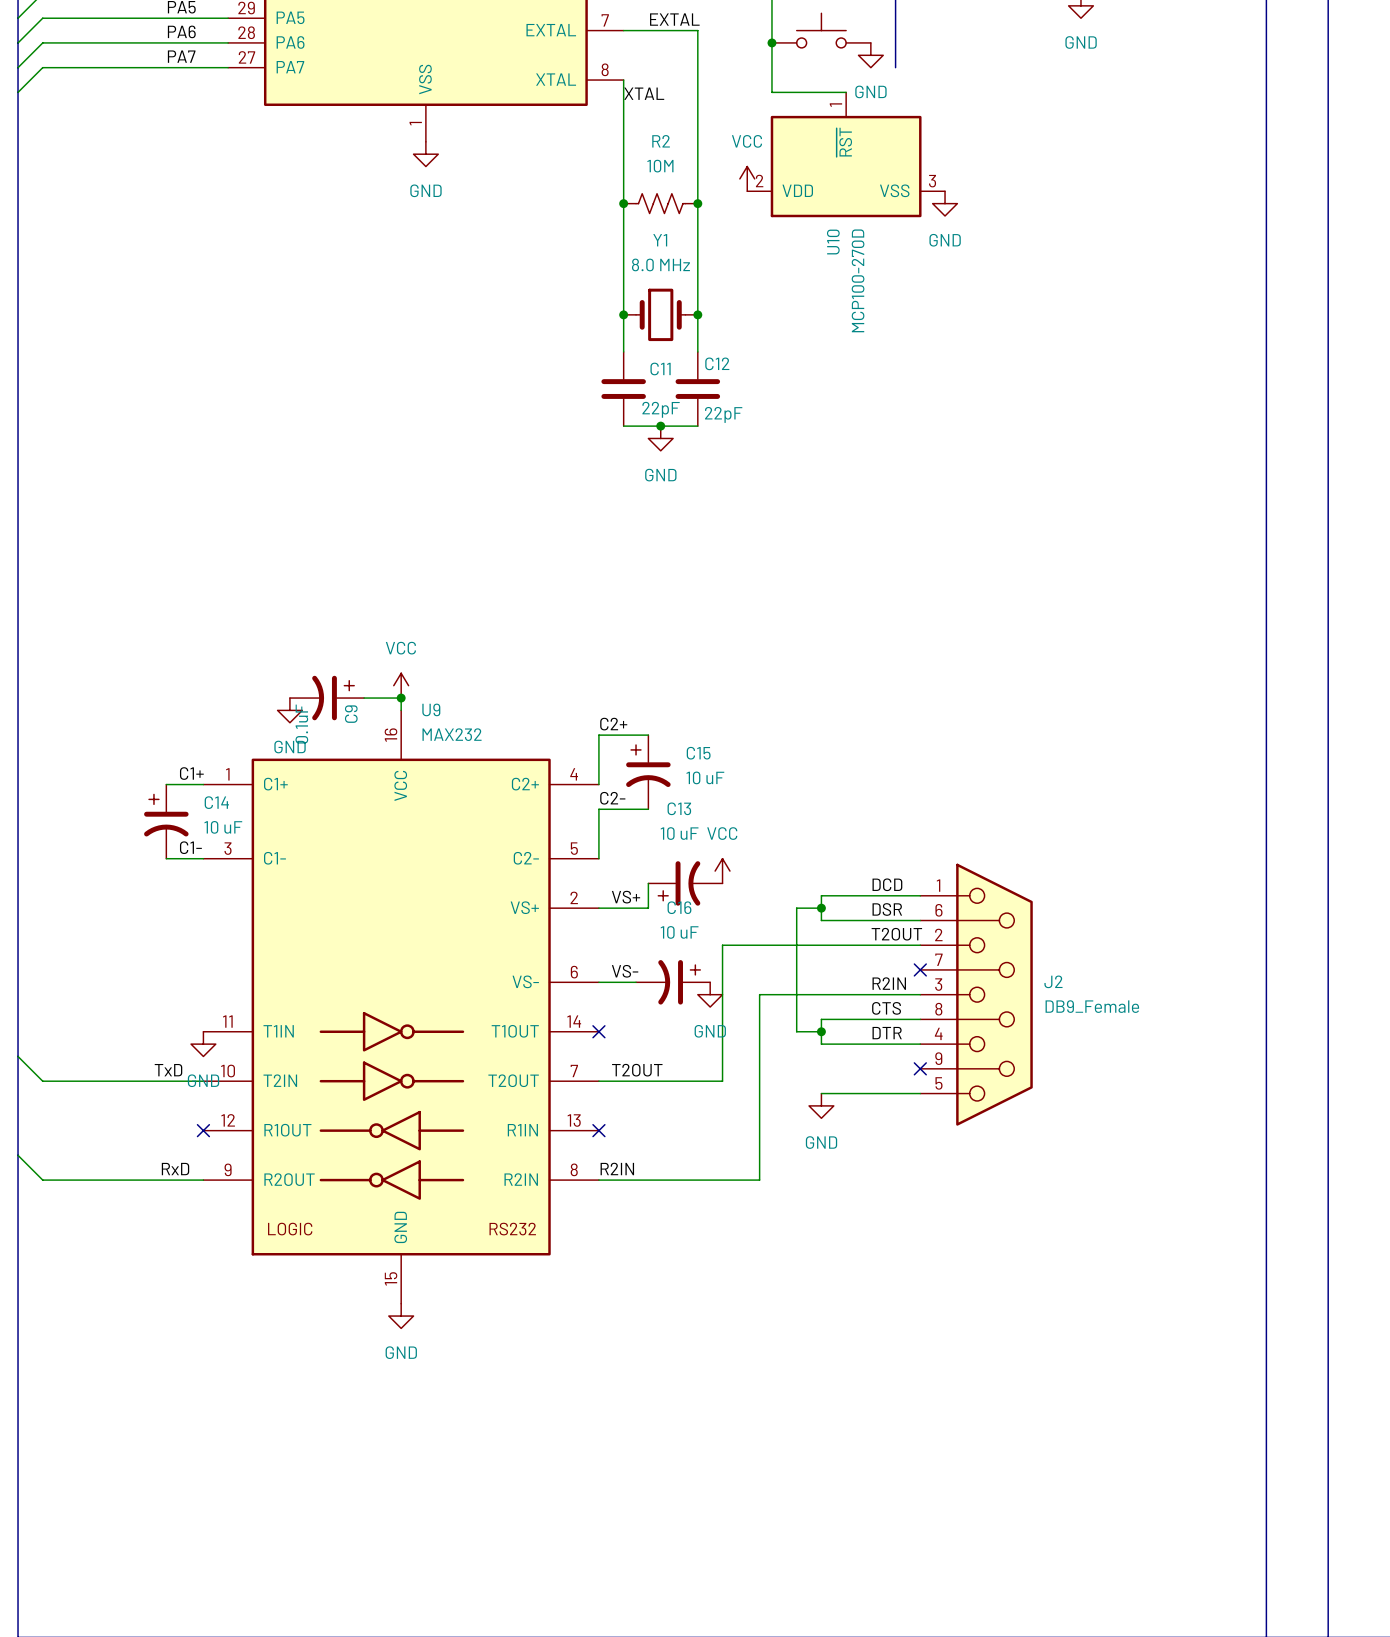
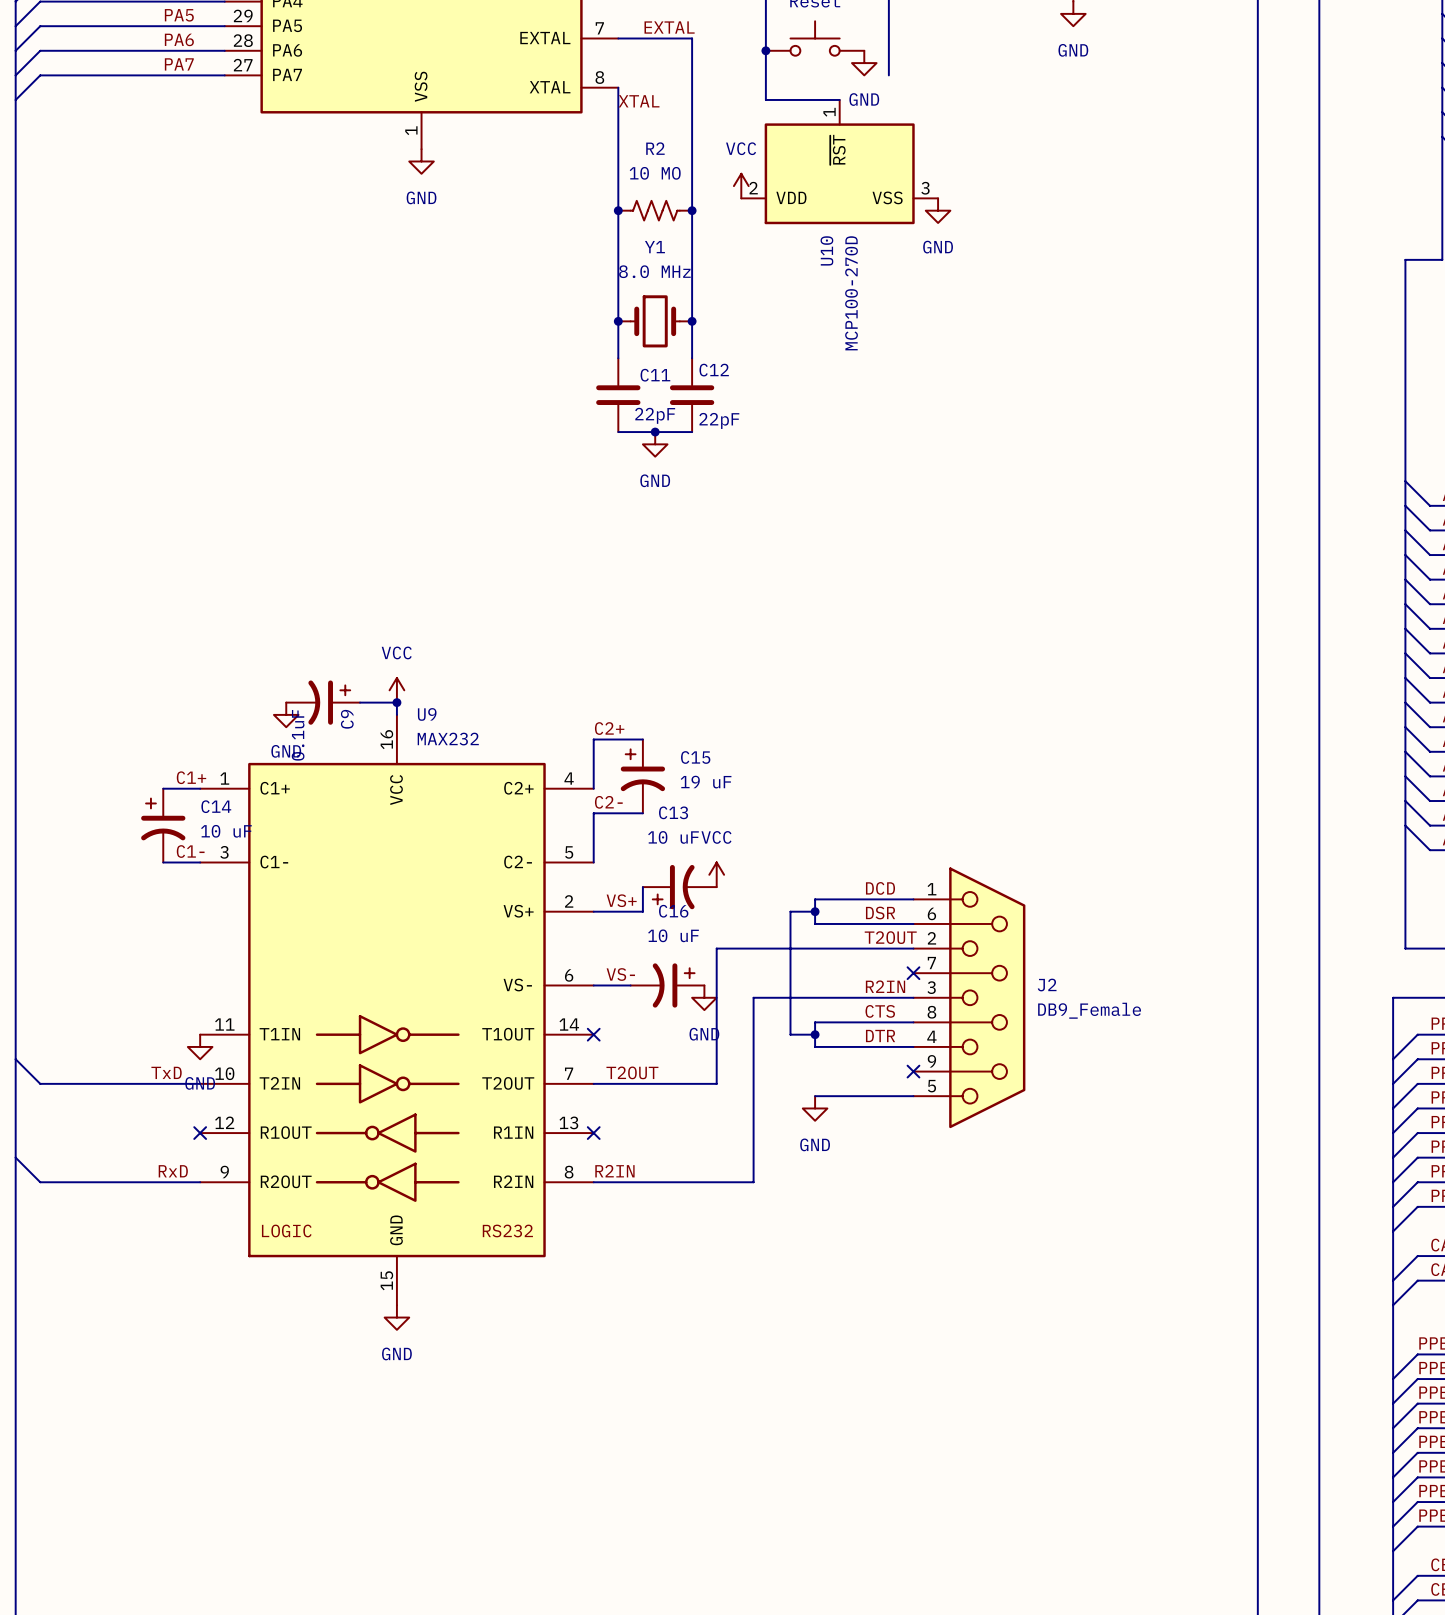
R2 value: 10M (660, 166) -> 10 MO (655, 173)
C15 value: 10 uF (705, 777) -> 19 uF (706, 782)

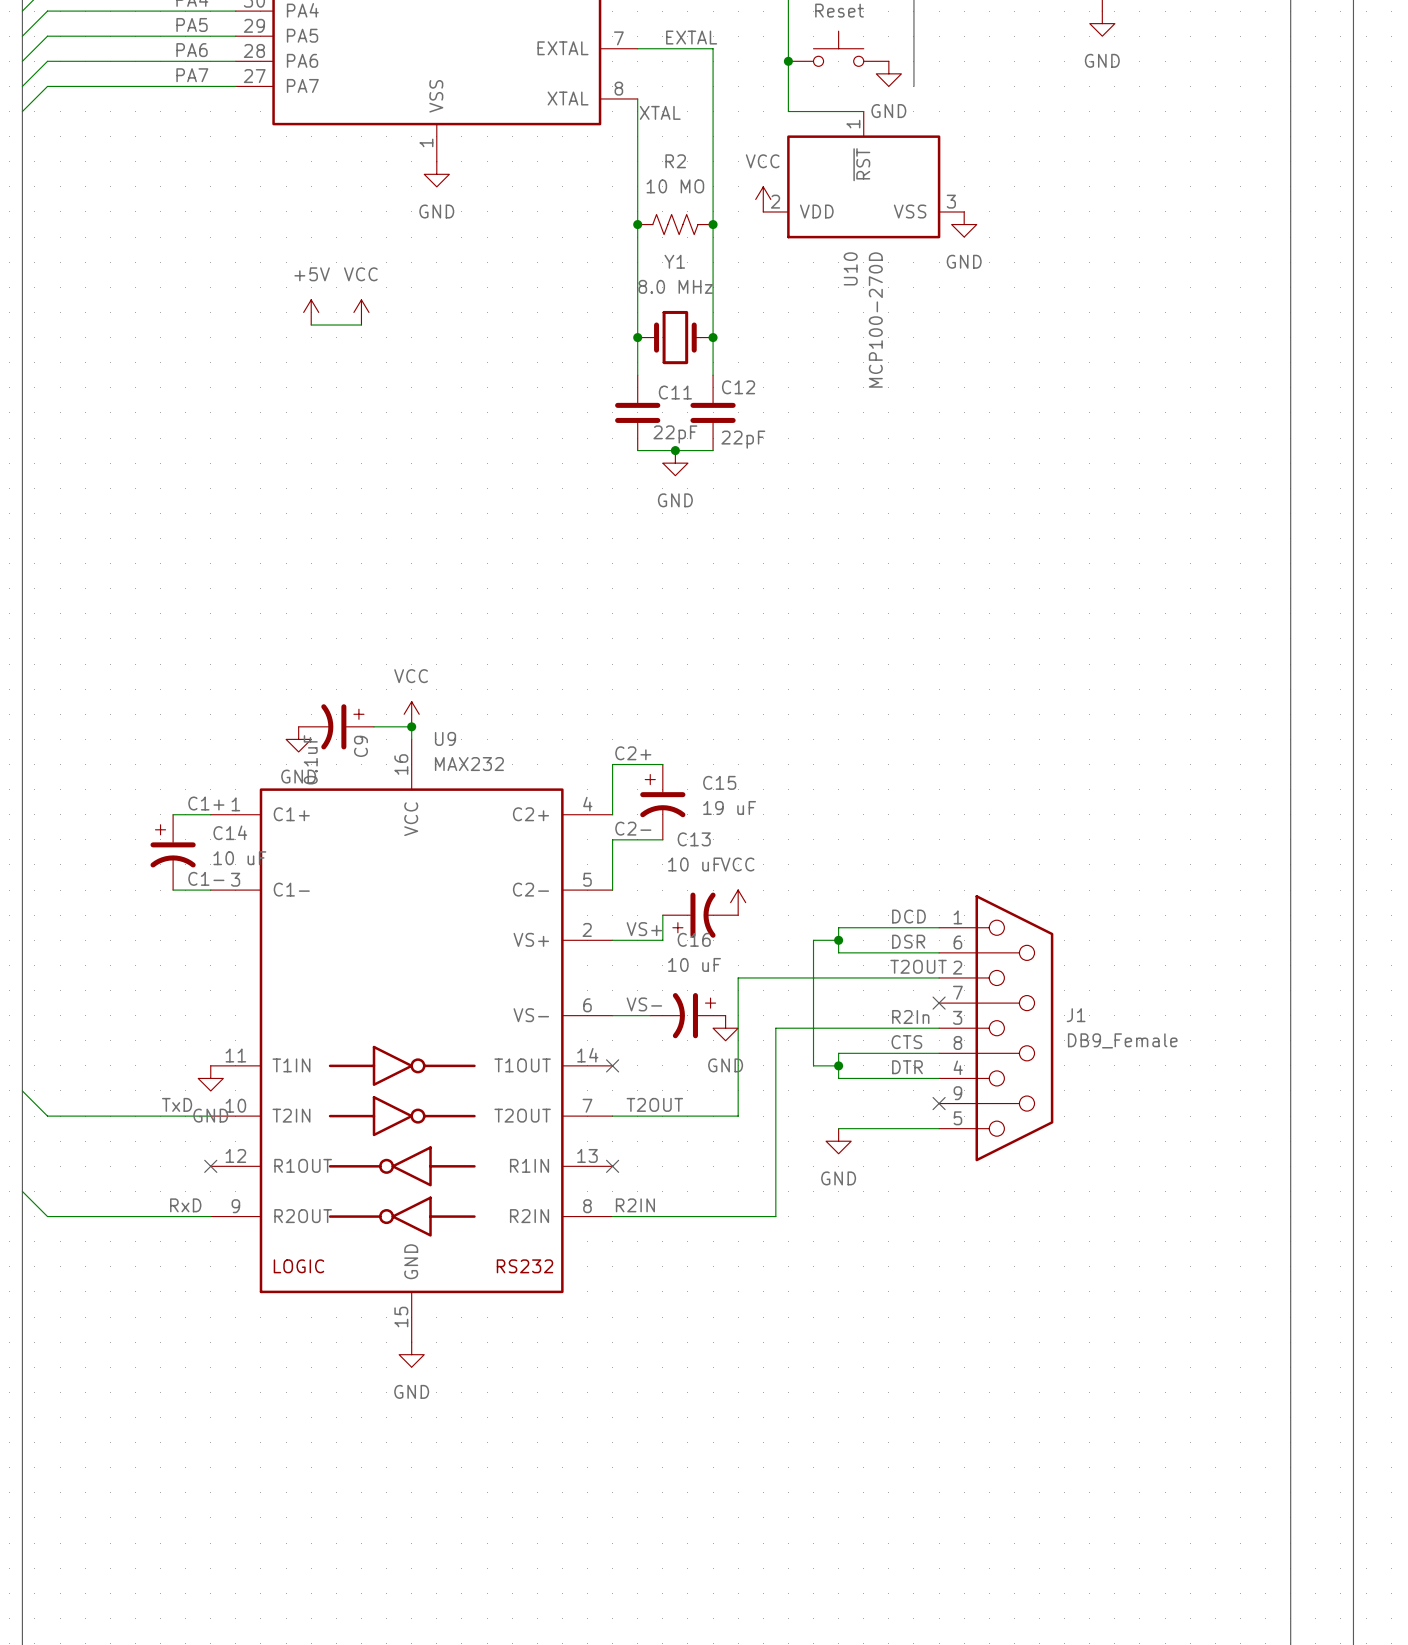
power symbol: none -> +5V (311, 312)
power symbol: none -> VCC (361, 312)
wire: none -> (311, 325) (361, 325)
J2 name: J2 (1047, 985) -> J1 (1076, 1015)
label: R2IN (885, 986) -> R2In (910, 1017)

